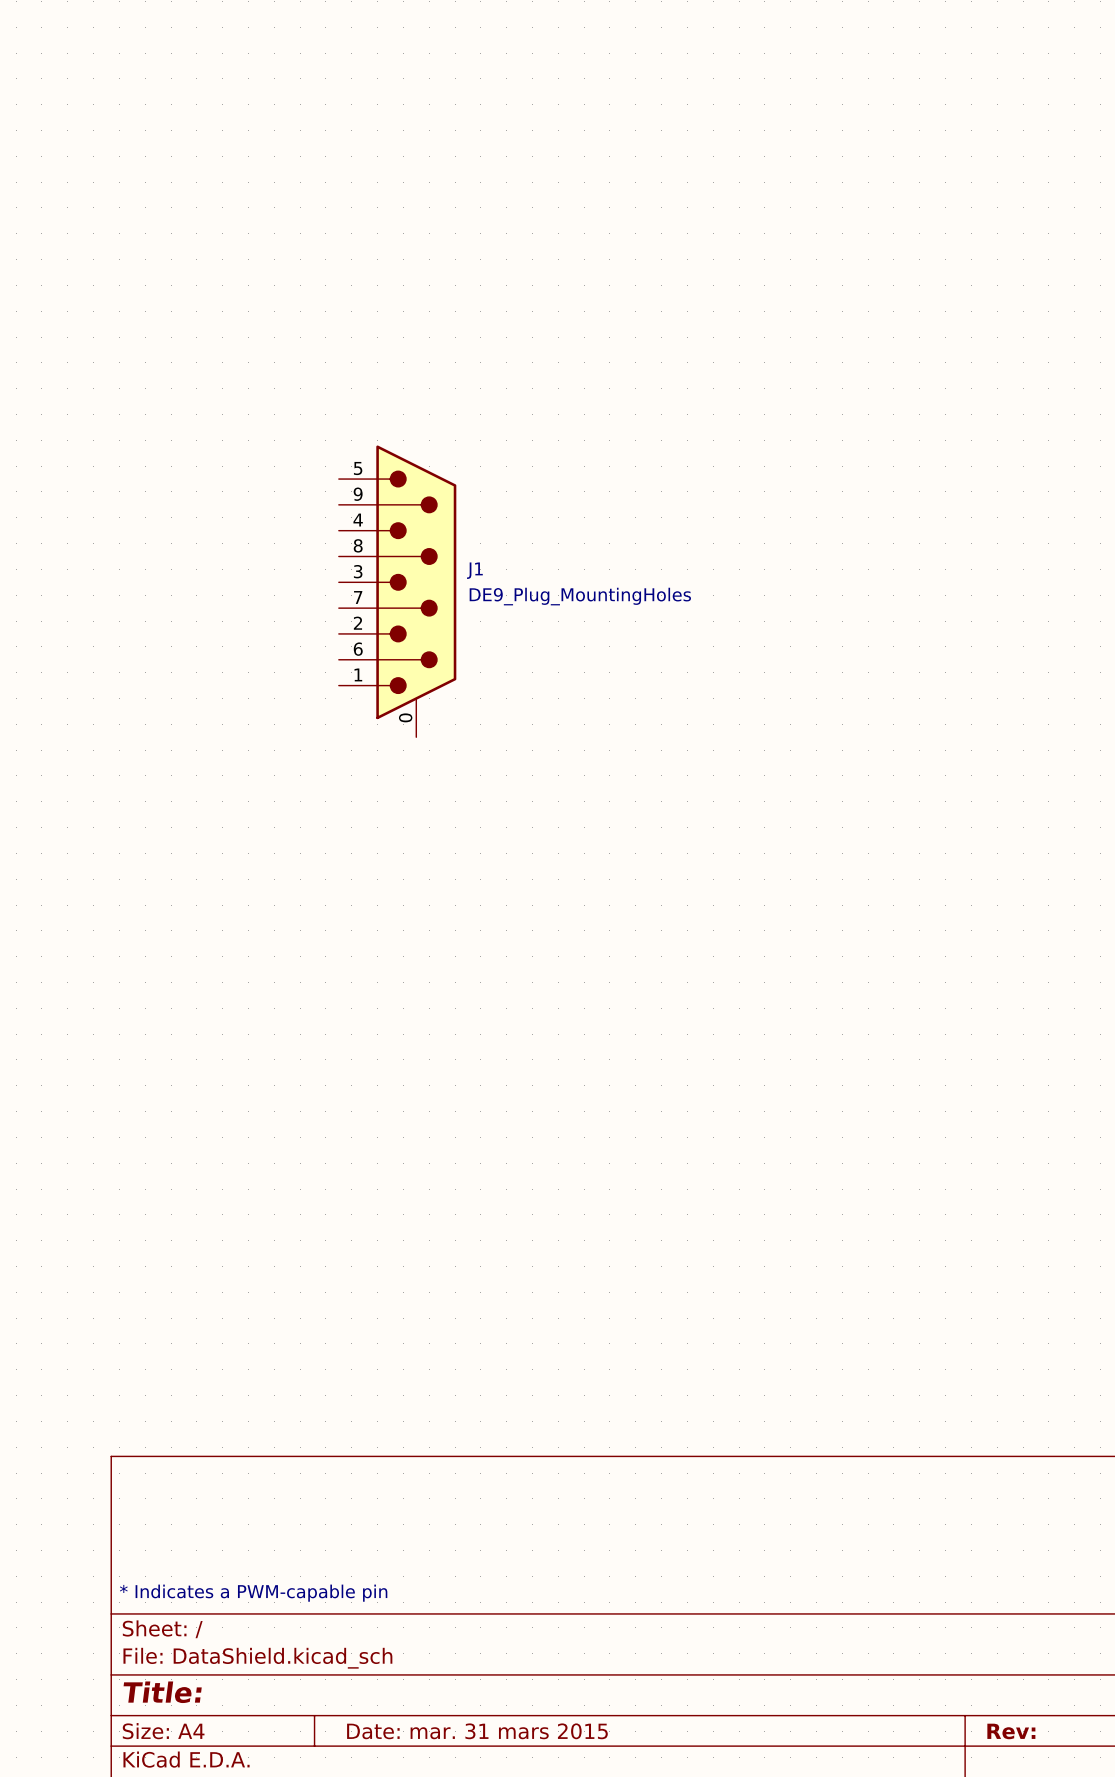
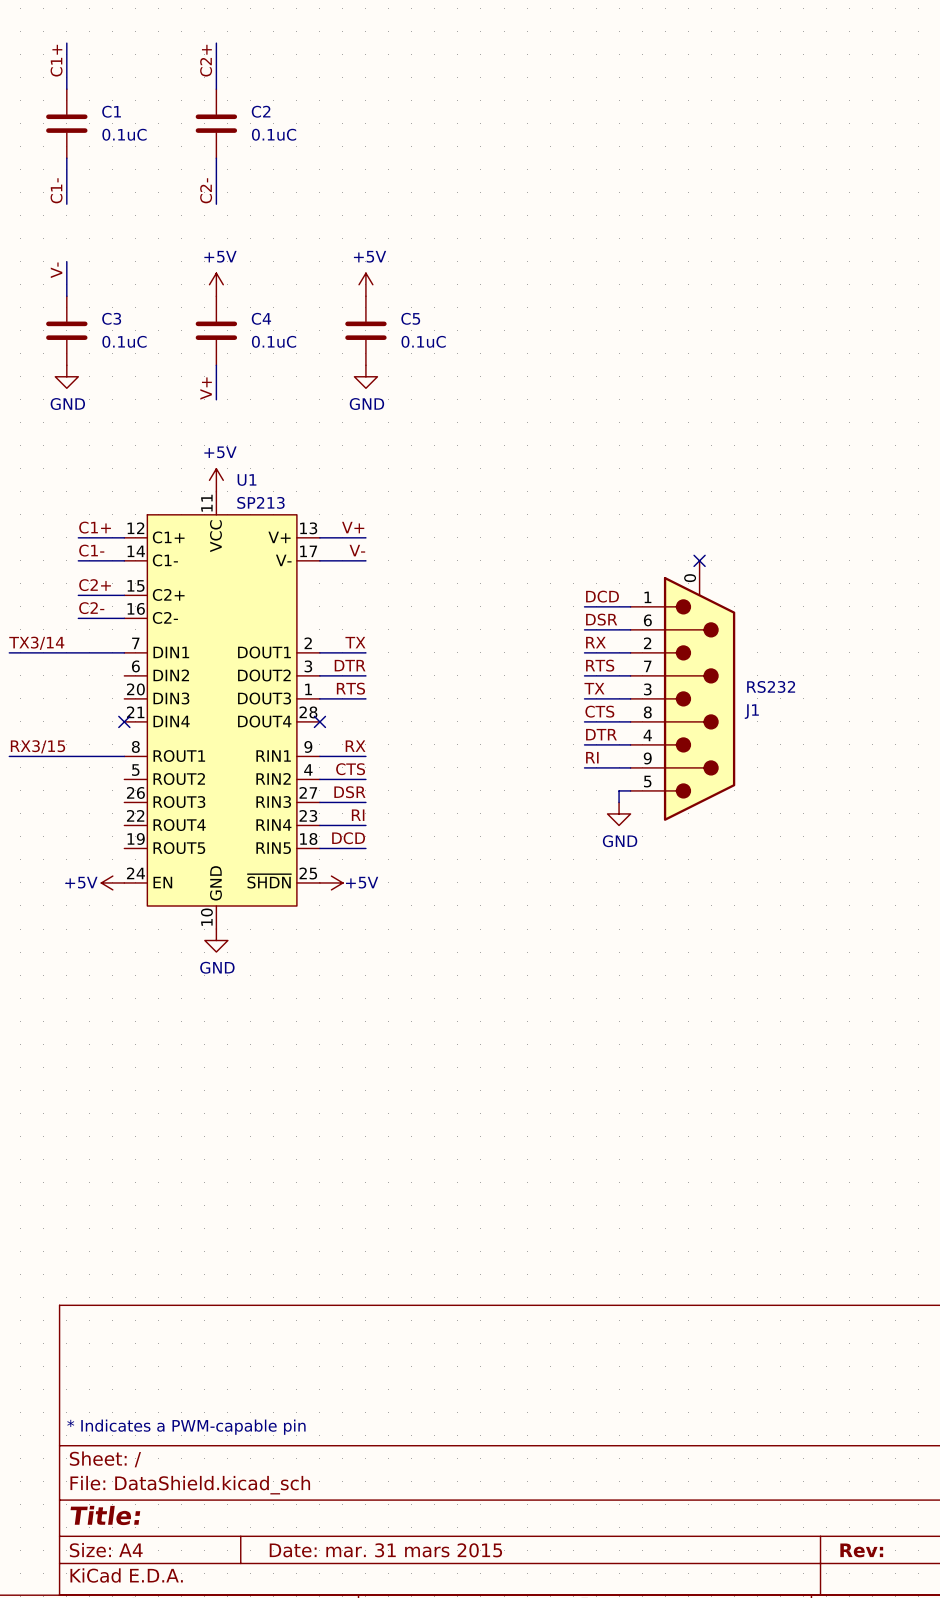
wire: none -> (66, 43) (66, 89)
wire: none -> (216, 43) (216, 89)
label: none -> C1+ (56, 60)
label: none -> C2+ (206, 60)
C1: none -> 0.1uC (66, 123)
C2: none -> 0.1uC (216, 123)
wire: none -> (66, 158) (66, 204)
wire: none -> (216, 158) (216, 204)
label: none -> C1- (56, 190)
label: none -> C2- (206, 190)
wire: none -> (66, 261) (66, 296)
label: none -> V- (56, 270)
power symbol: none -> +5V (216, 284)
power symbol: none -> +5V (365, 284)
C3: none -> 0.1uC (66, 330)
C4: none -> 0.1uC (216, 330)
C5: none -> 0.1uC (365, 330)
wire: none -> (216, 365) (216, 399)
power symbol: none -> GND (66, 376)
power symbol: none -> GND (365, 376)
label: none -> V+ (206, 388)
power symbol: none -> +5V (216, 480)
J1 flip: as is (416, 582) -> up-down (699, 698)
label: none -> C1+ (95, 527)
label: none -> V+ (353, 527)
J1 position: (397, 591) -> (682, 690)
wire: none -> (78, 537) (124, 537)
J1 value: DE9_Plug_MountingHoles (580, 596) -> RS232 (771, 686)
label: none -> C1- (91, 550)
label: none -> V- (357, 550)
wire: none -> (78, 560) (124, 560)
no-connect mark: none -> (699, 560)
label: none -> C2+ (95, 585)
wire: none -> (78, 595) (124, 595)
label: none -> DCD (602, 596)
wire: none -> (584, 606) (630, 606)
label: none -> C2- (91, 608)
wire: none -> (78, 618) (124, 618)
label: none -> DSR (601, 619)
wire: none -> (584, 629) (630, 629)
label: none -> TX (355, 642)
label: none -> RX (595, 642)
label: none -> TX3/14 (36, 643)
wire: none -> (9, 652) (124, 652)
wire: none -> (319, 652) (365, 652)
wire: none -> (584, 652) (630, 652)
label: none -> DTR (350, 665)
label: none -> RTS (600, 665)
wire: none -> (319, 675) (365, 675)
wire: none -> (584, 675) (630, 675)
label: none -> RTS (350, 688)
label: none -> TX (594, 688)
wire: none -> (319, 698) (365, 698)
wire: none -> (584, 698) (630, 698)
U1: none -> SP213 (222, 710)
label: none -> CTS (599, 711)
no-connect mark: none -> (124, 721)
no-connect mark: none -> (319, 721)
wire: none -> (584, 721) (630, 721)
label: none -> DTR (601, 734)
wire: none -> (584, 744) (630, 744)
label: none -> RX (355, 746)
label: none -> RX3/15 (37, 746)
wire: none -> (9, 756) (124, 756)
wire: none -> (319, 756) (365, 756)
label: none -> RI (592, 757)
wire: none -> (584, 767) (630, 767)
label: none -> CTS (350, 769)
wire: none -> (319, 779) (365, 779)
wire: none -> (630, 790) (619, 790) (619, 802)
label: none -> DSR (349, 792)
wire: none -> (319, 802) (365, 802)
power symbol: none -> GND (619, 813)
label: none -> RI (358, 815)
wire: none -> (319, 825) (365, 825)
label: none -> DCD (348, 838)
wire: none -> (319, 848) (365, 848)
power symbol: none -> +5V (112, 882)
power symbol: none -> +5V (331, 882)
power symbol: none -> GND (216, 940)

